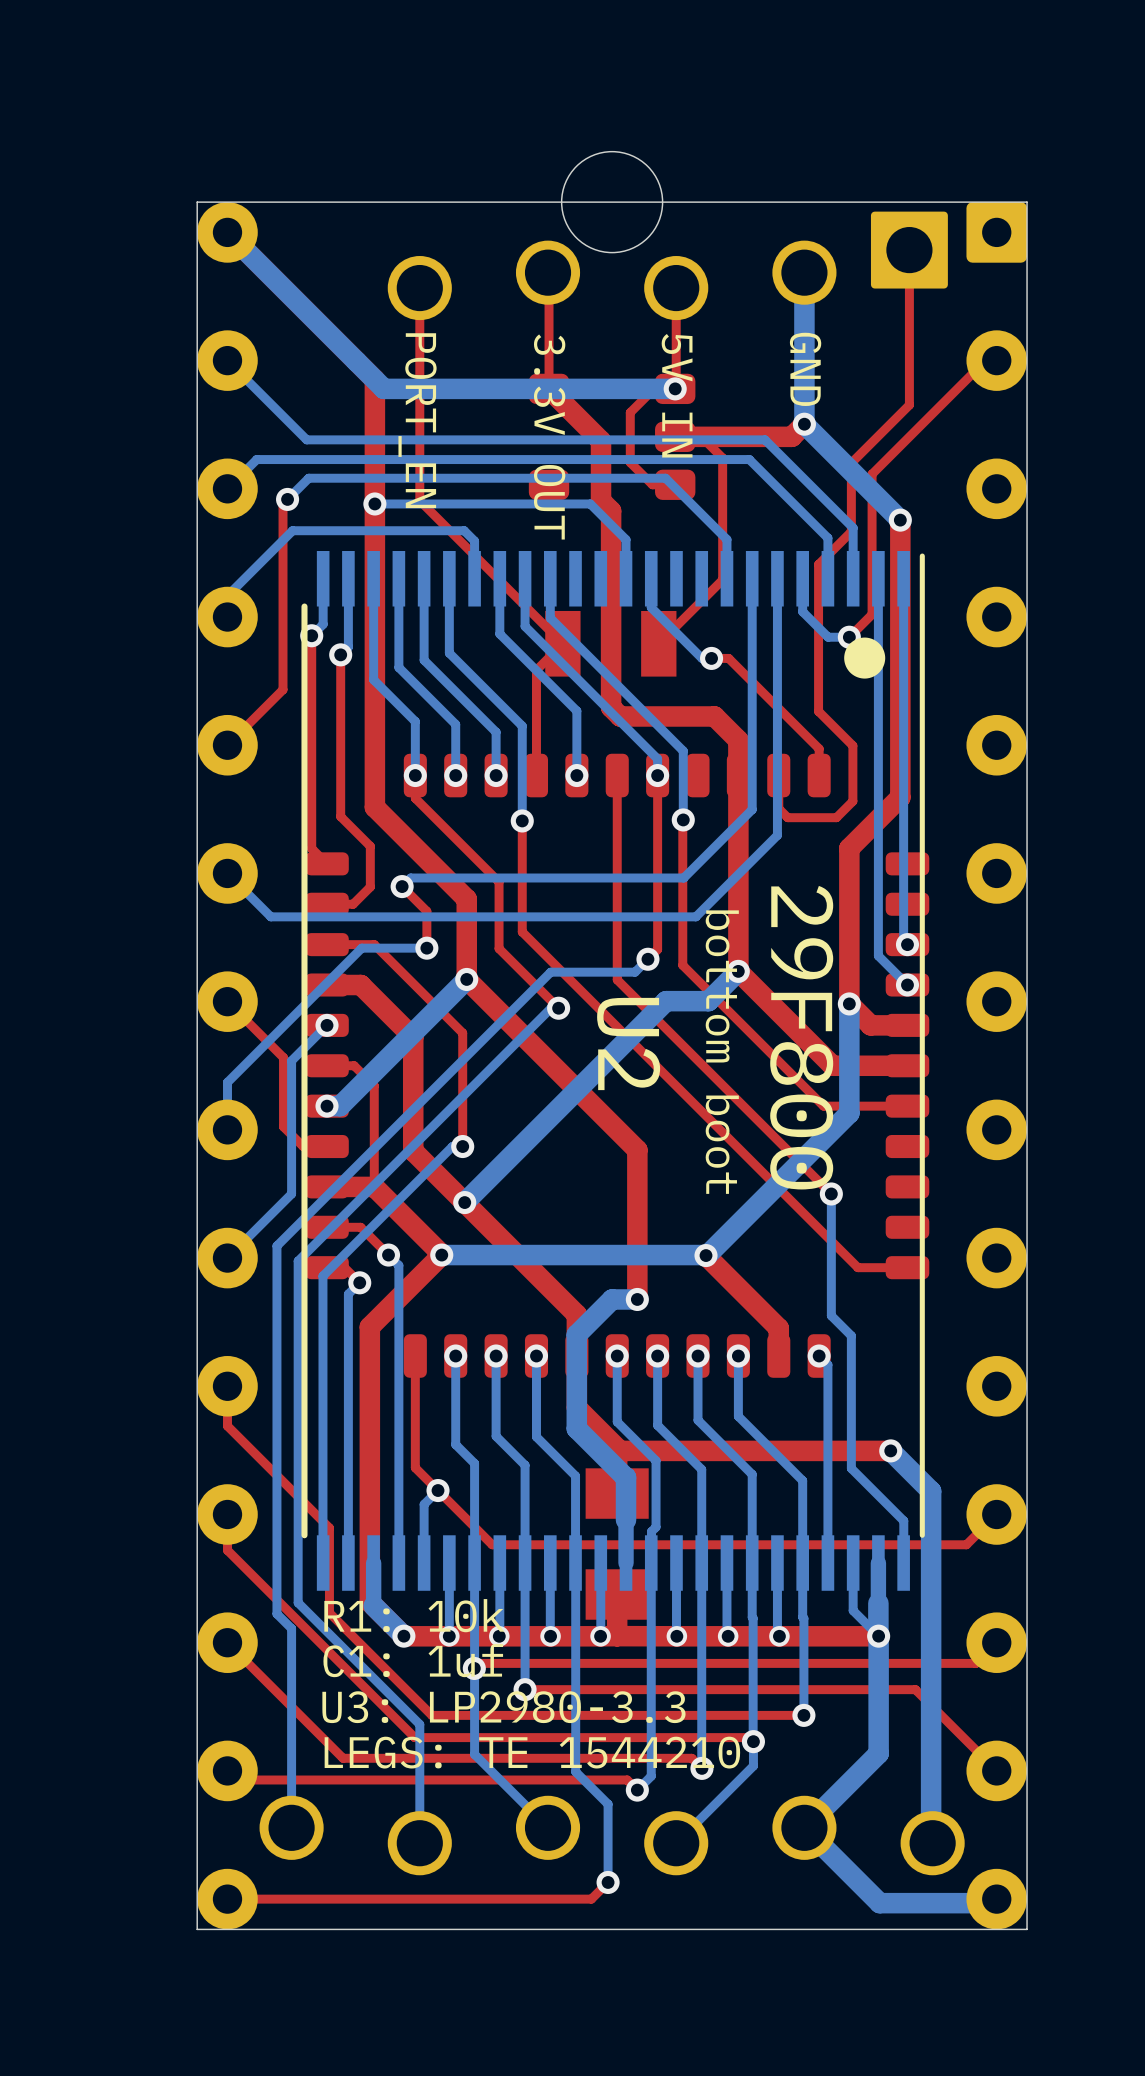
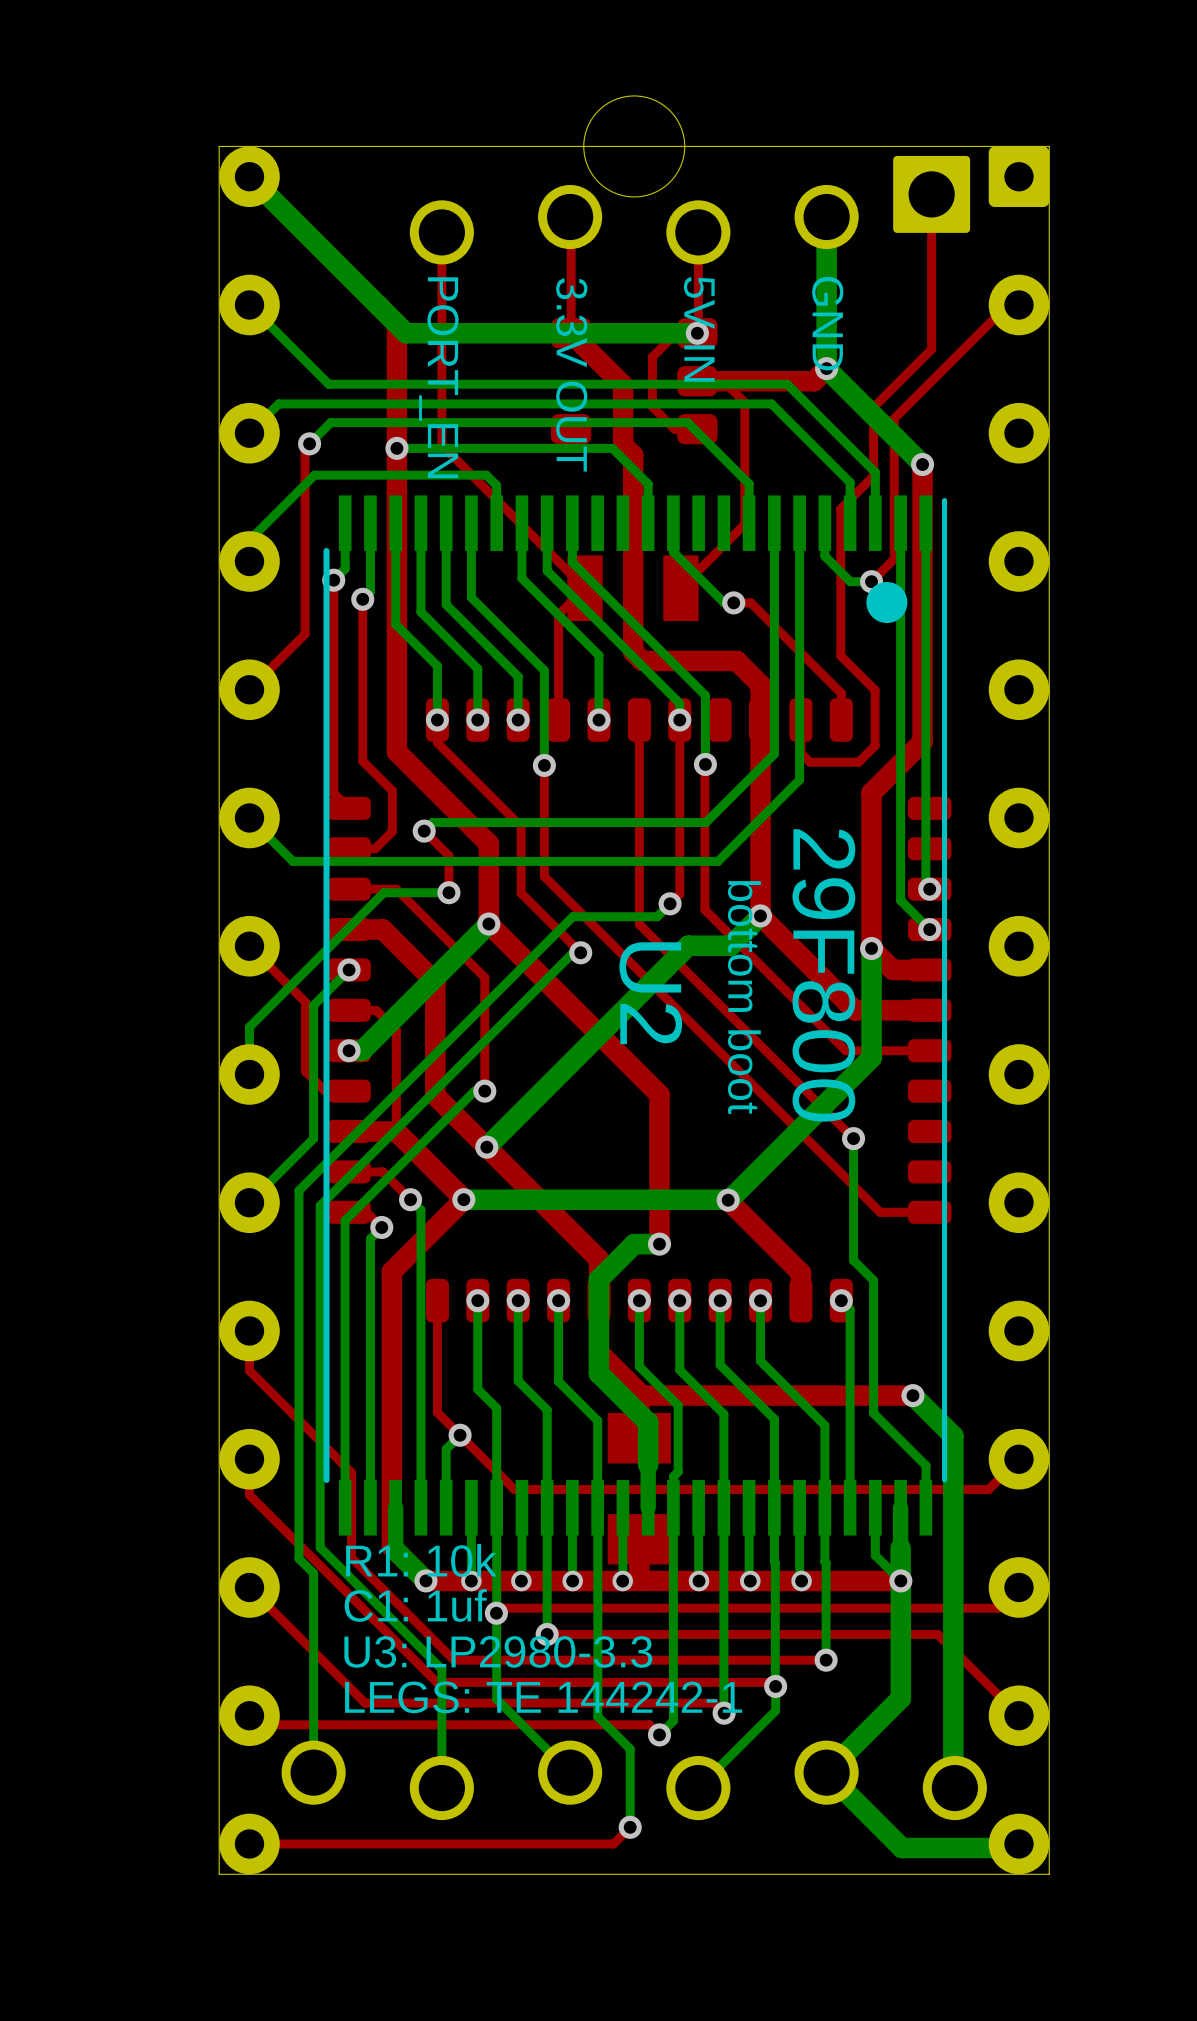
text: LEGS: TE 1544210 (532, 1752) -> LEGS: TE 144242-1 (543, 1697)

